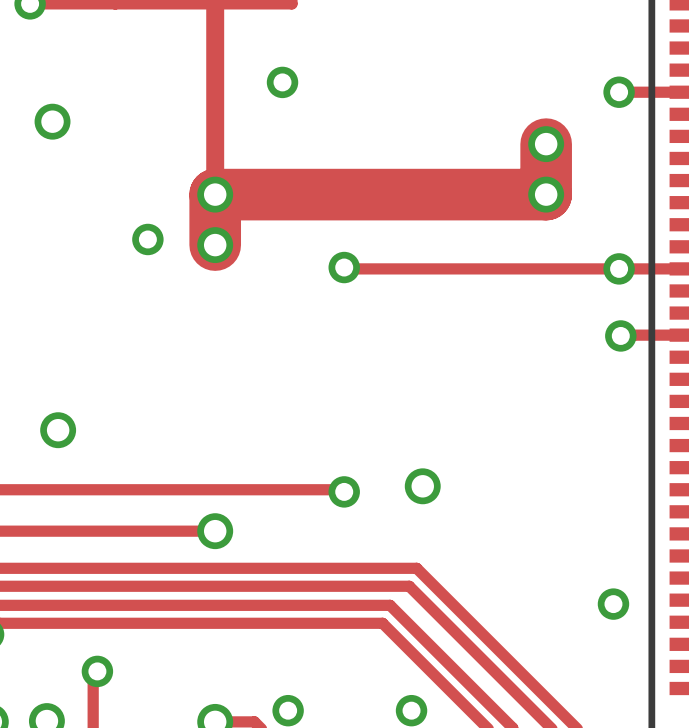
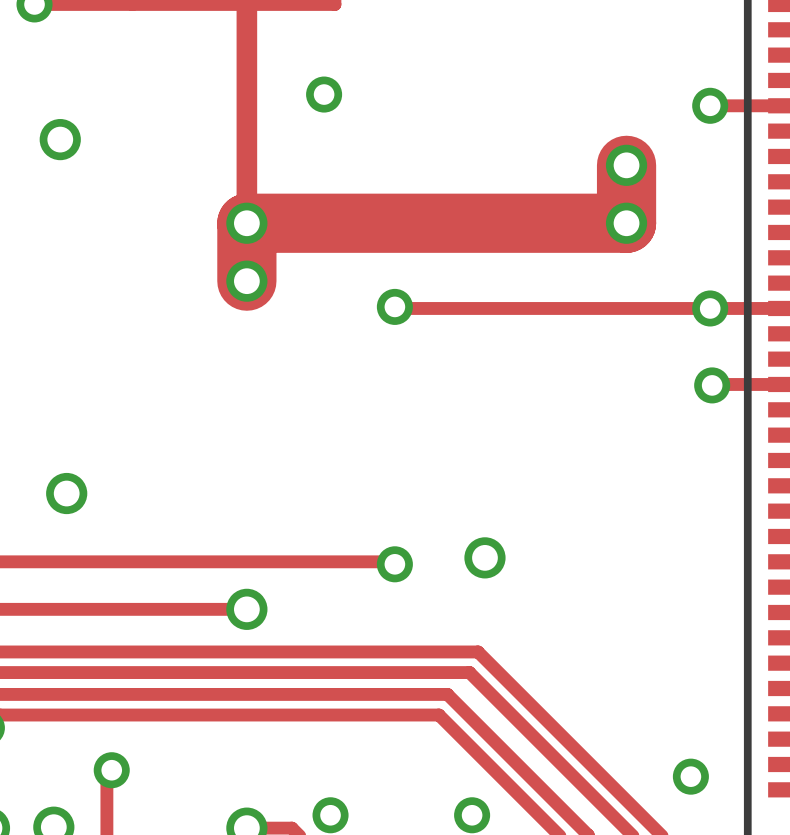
via: (147, 239) -> none
via position: (613, 604) -> (690, 776)

